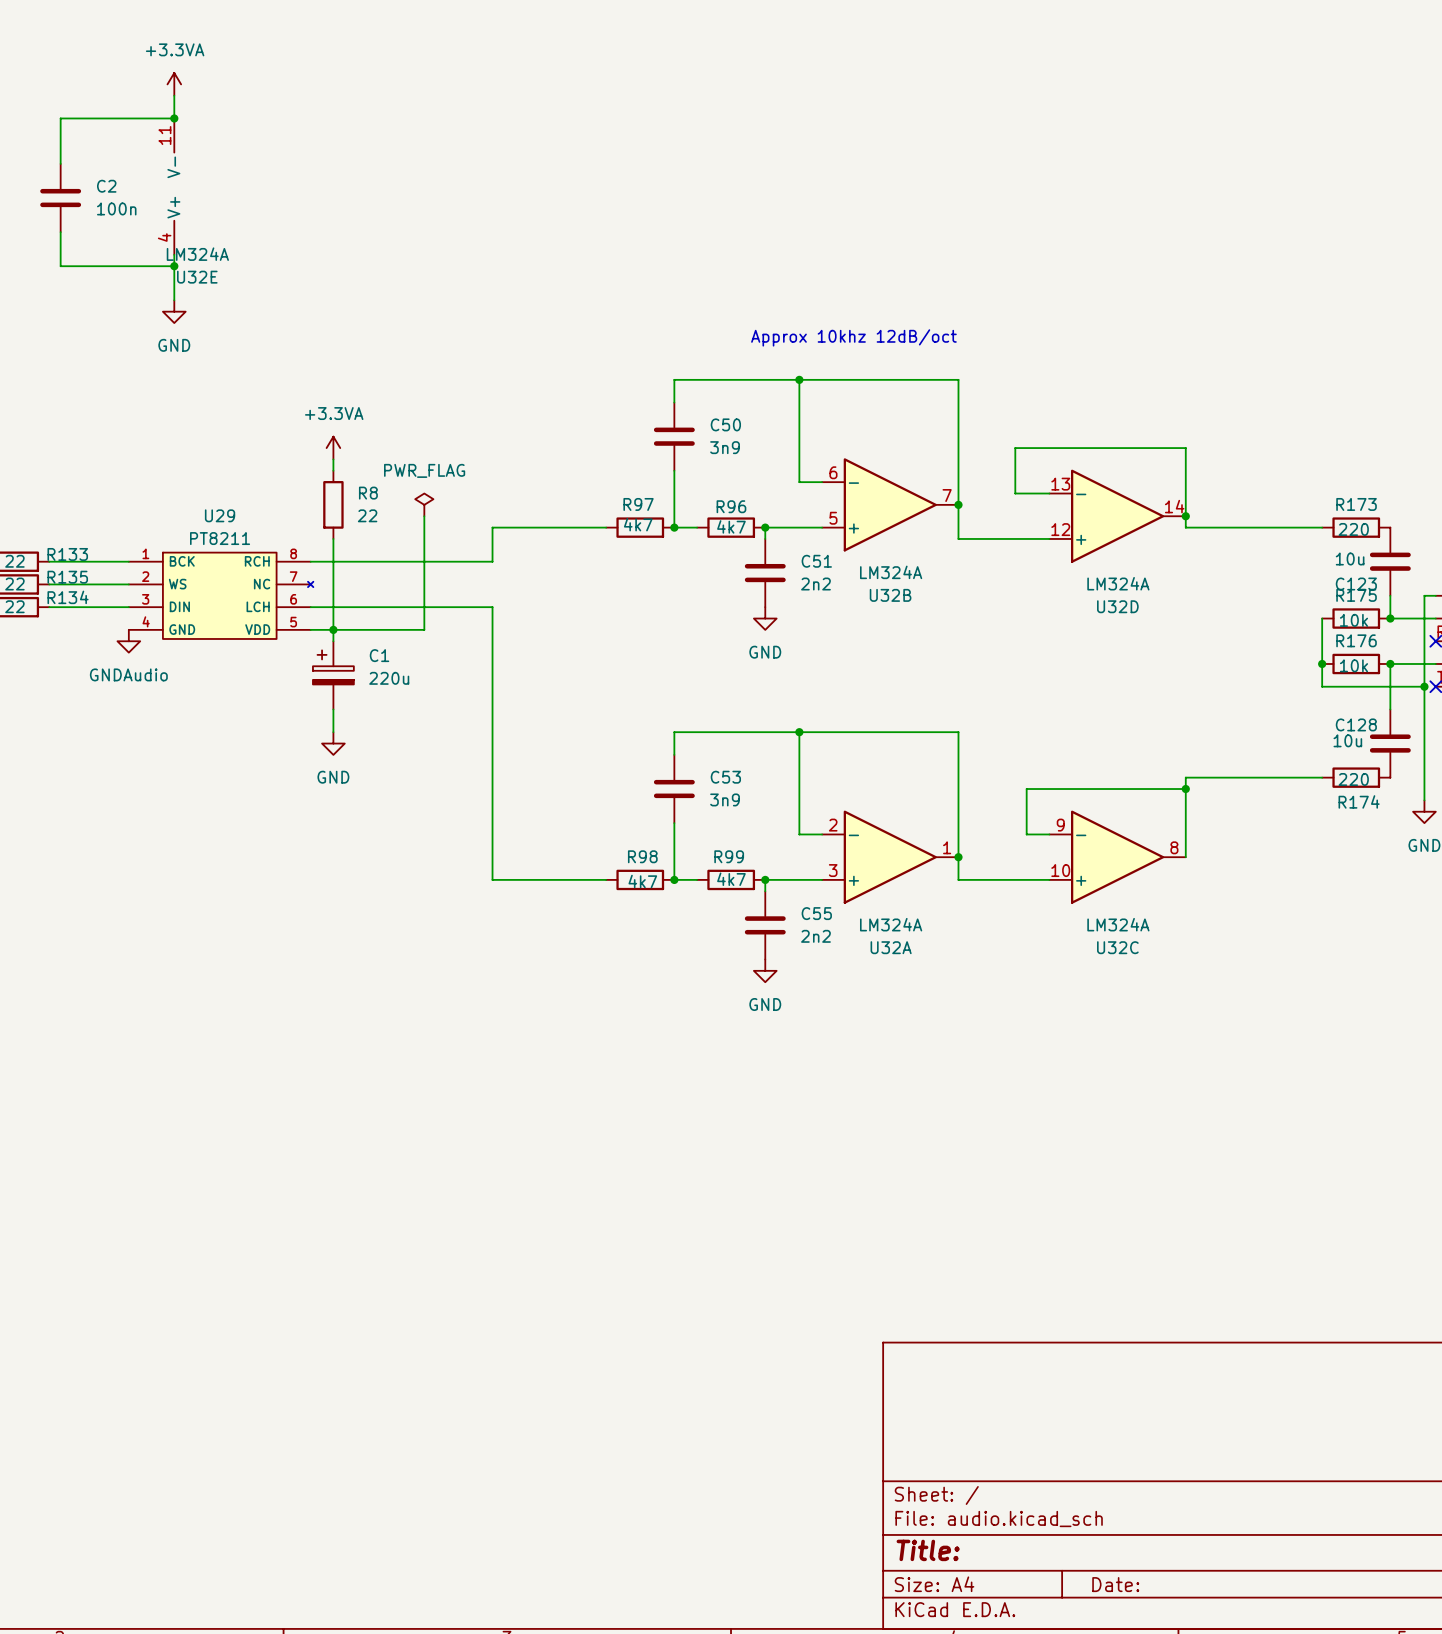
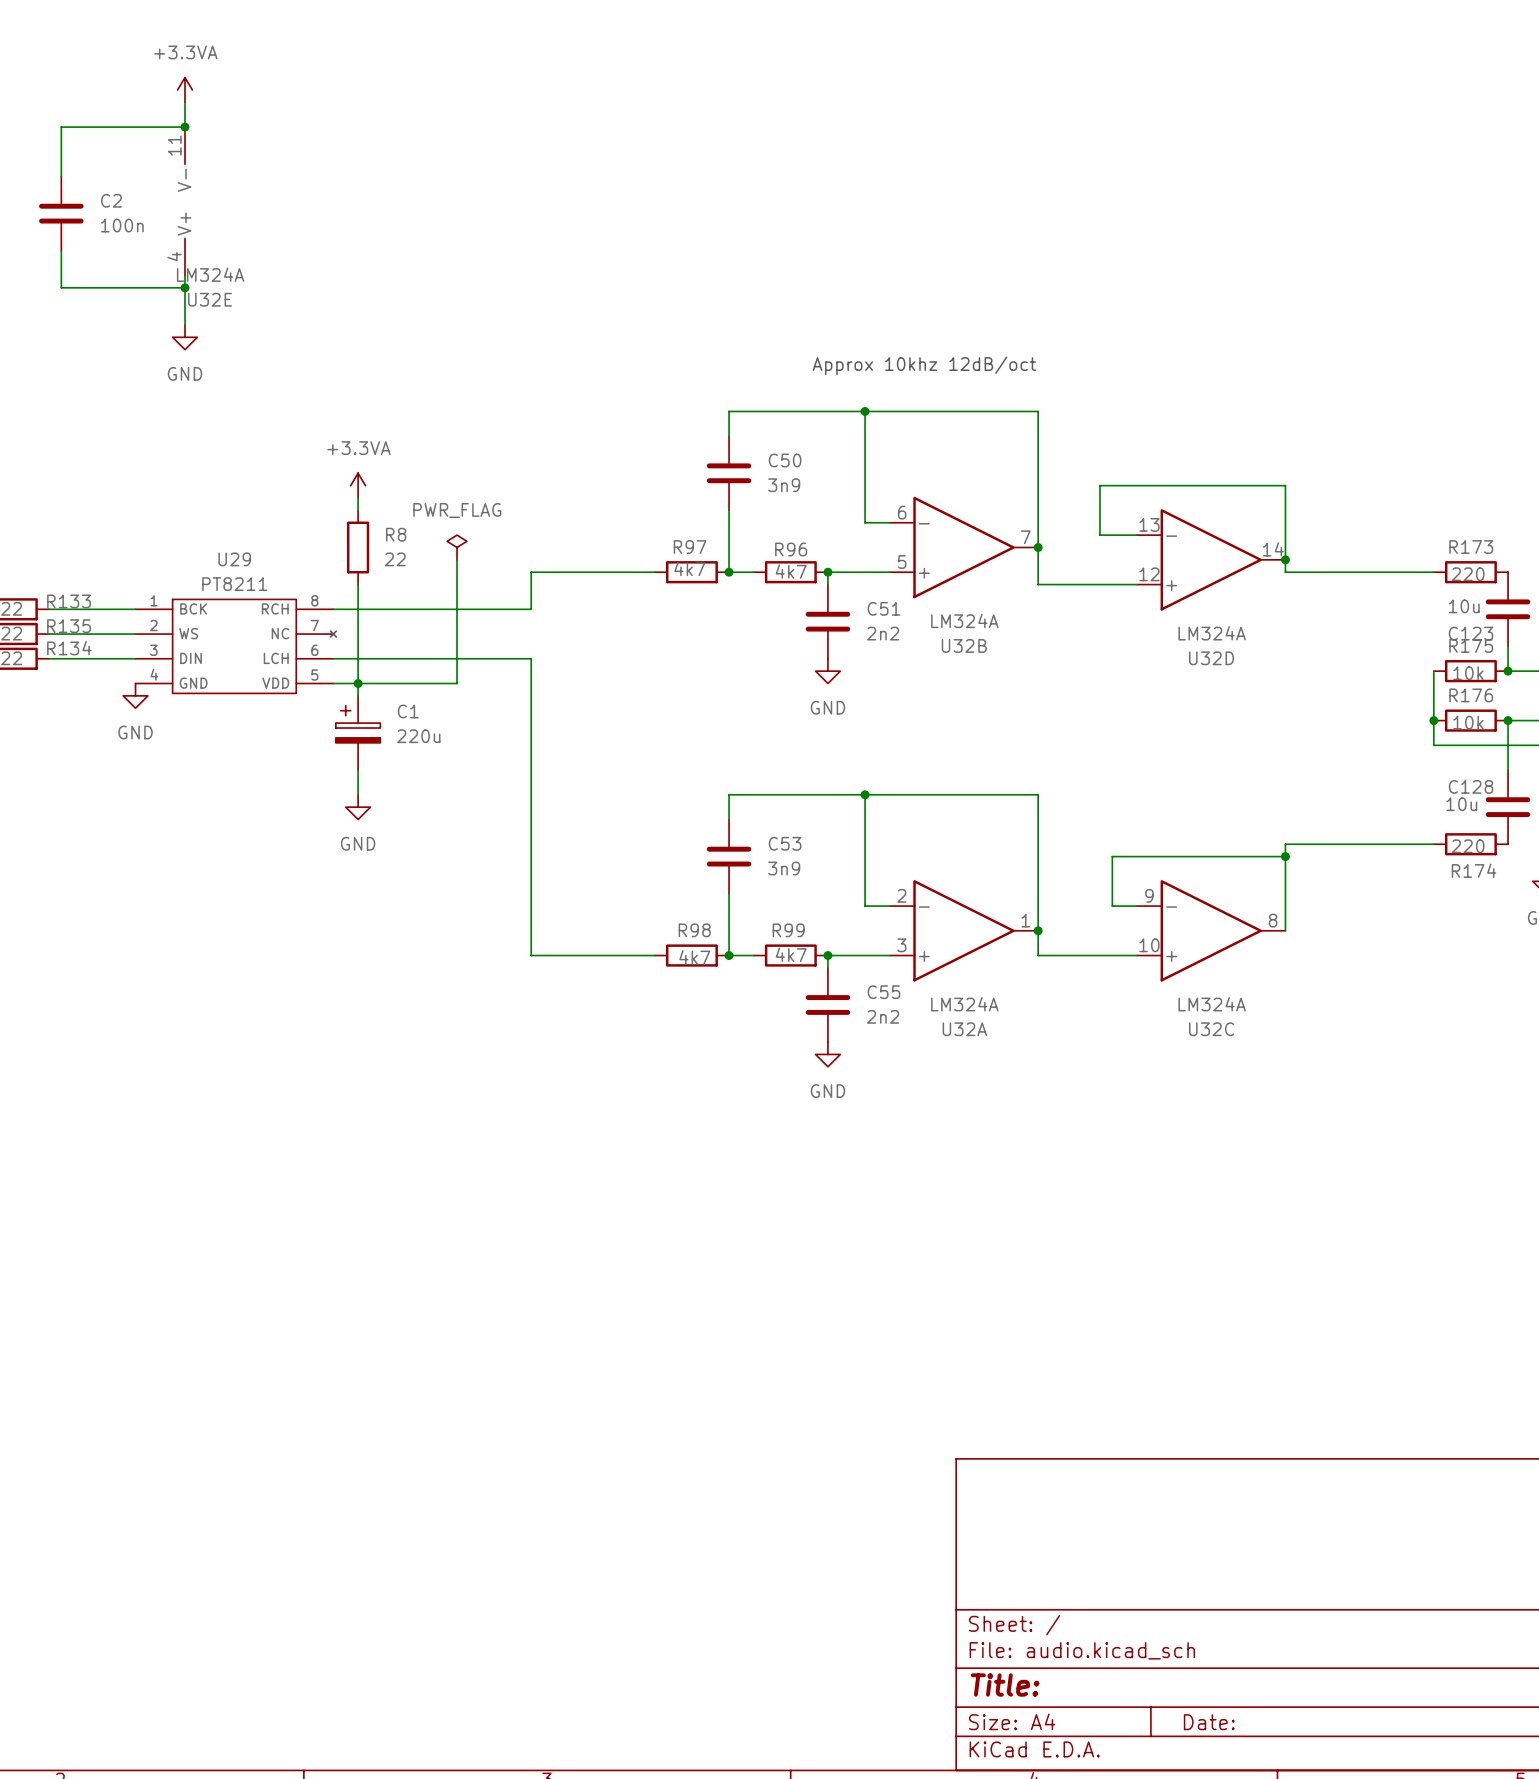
power symbol: GNDAudio (128, 641) -> GND (135, 695)

